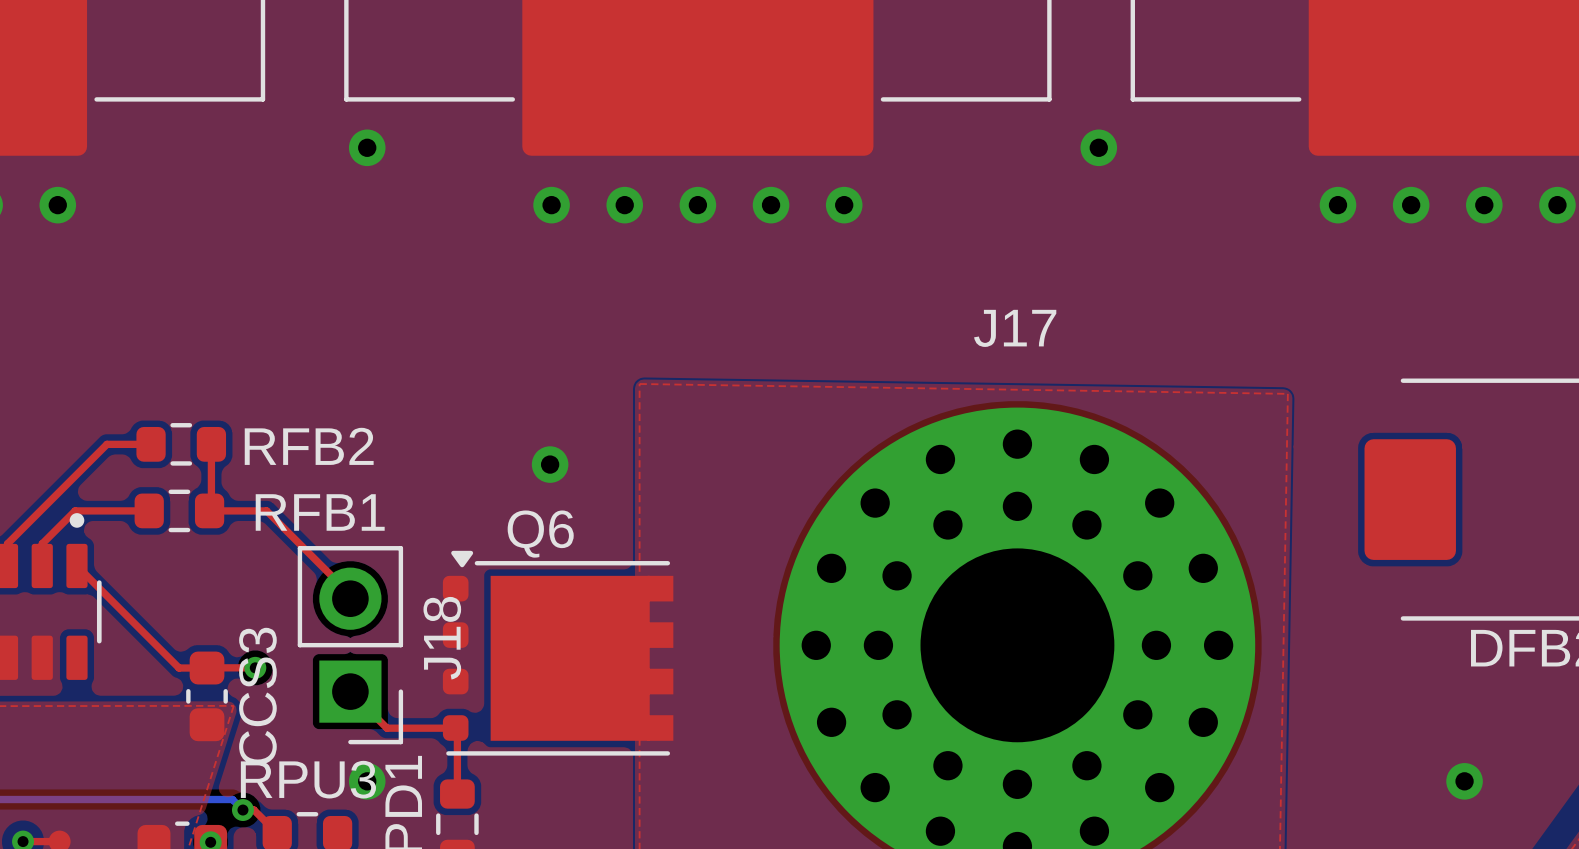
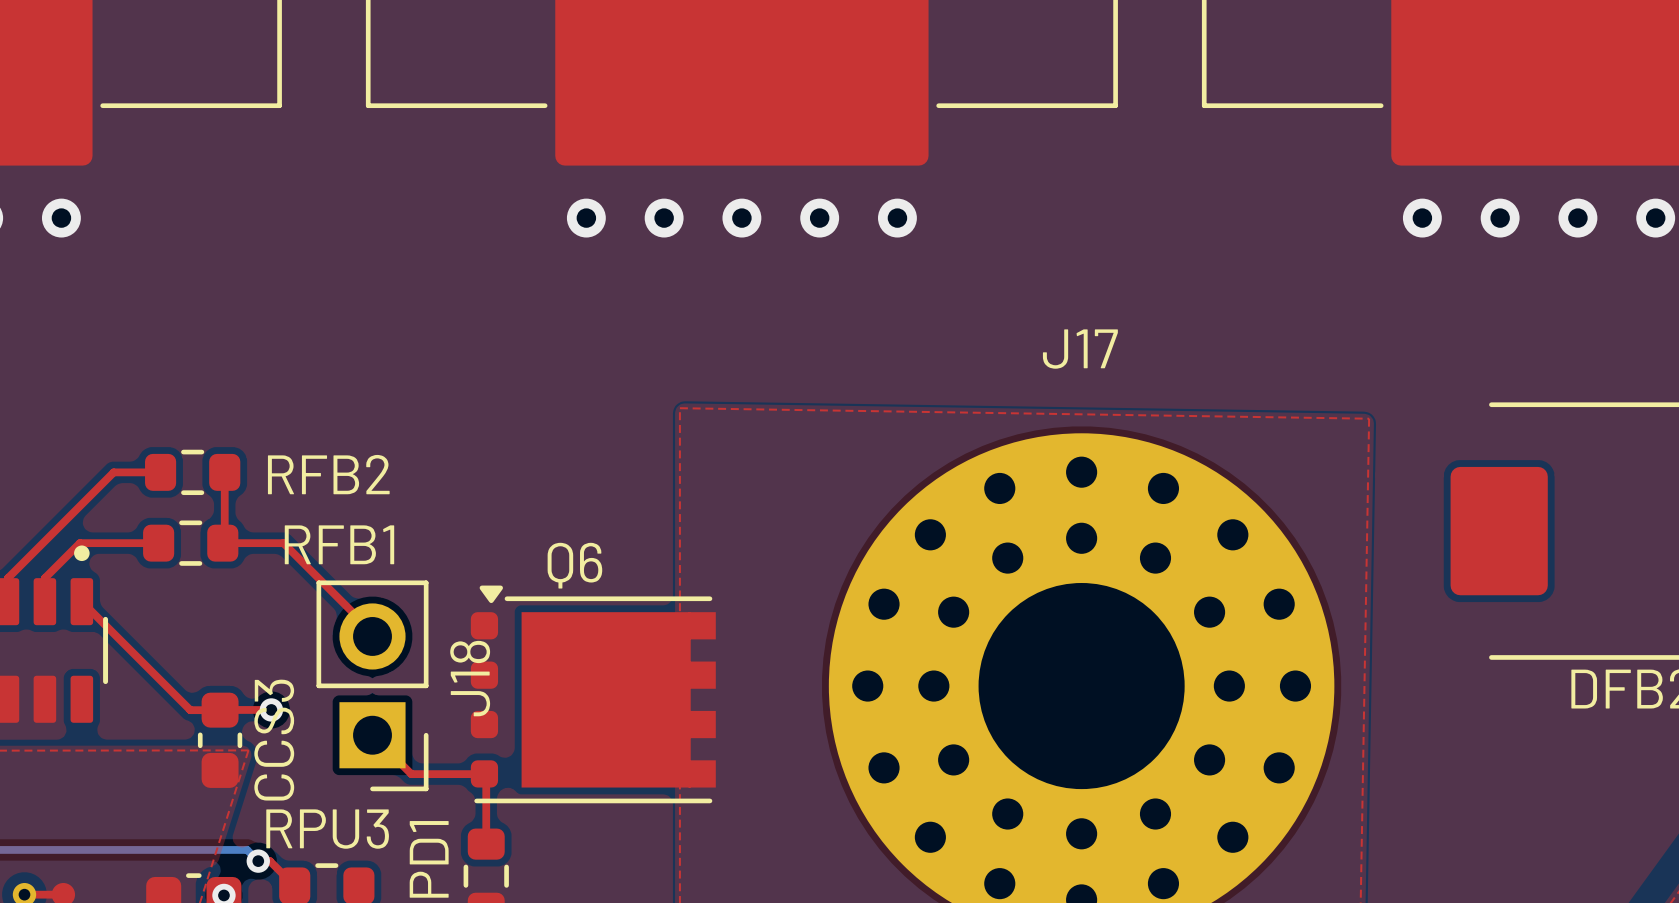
via: (367, 147) -> none
via: (1098, 147) -> none
via: (550, 464) -> none
via: (367, 781) -> none
via: (1464, 781) -> none

